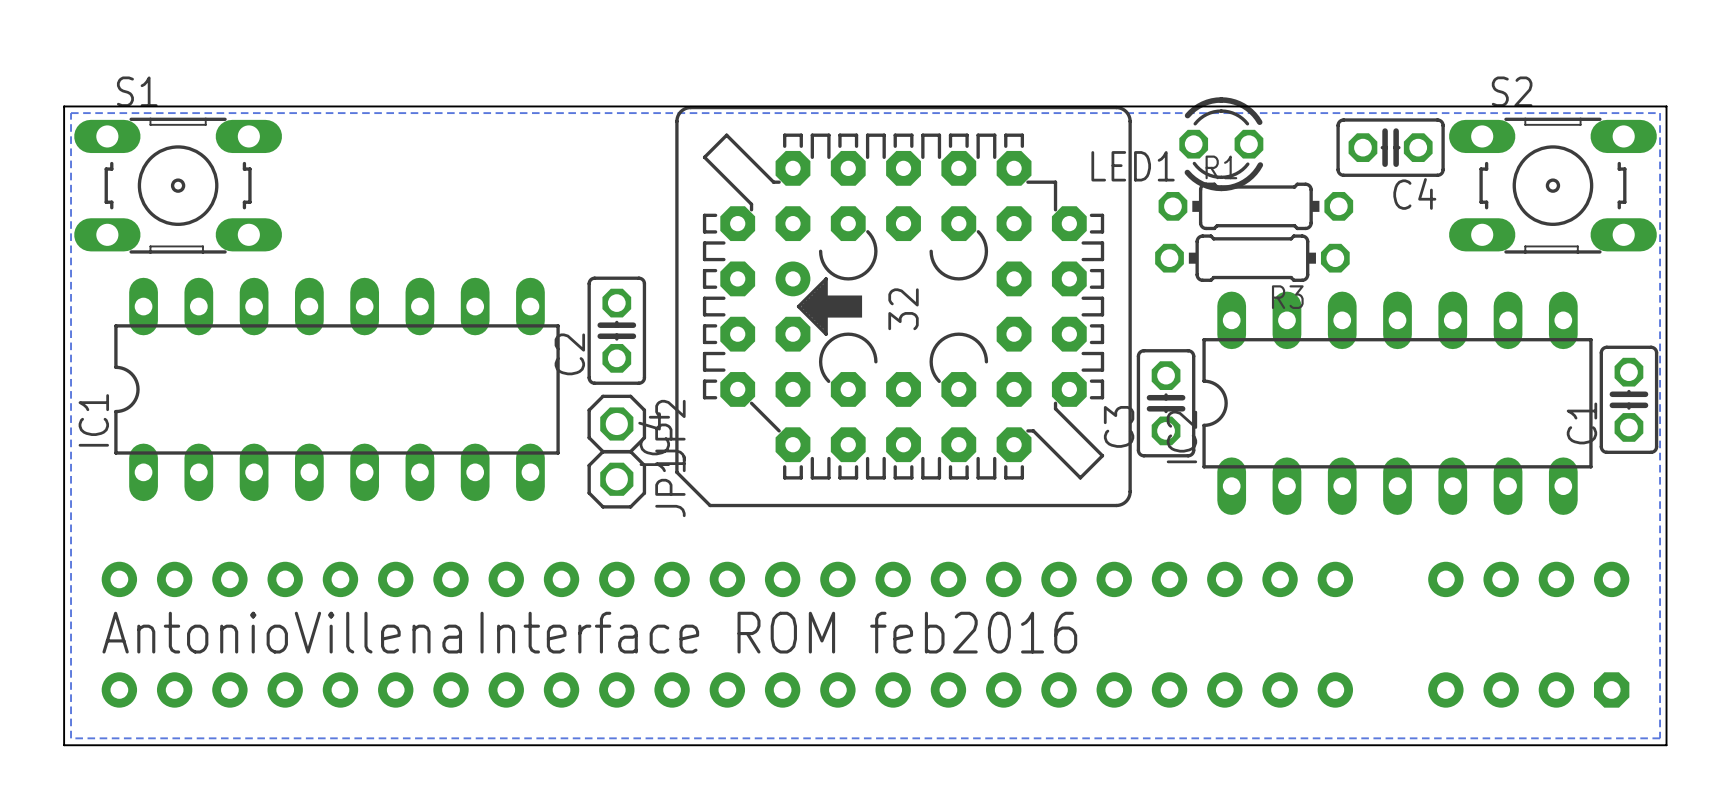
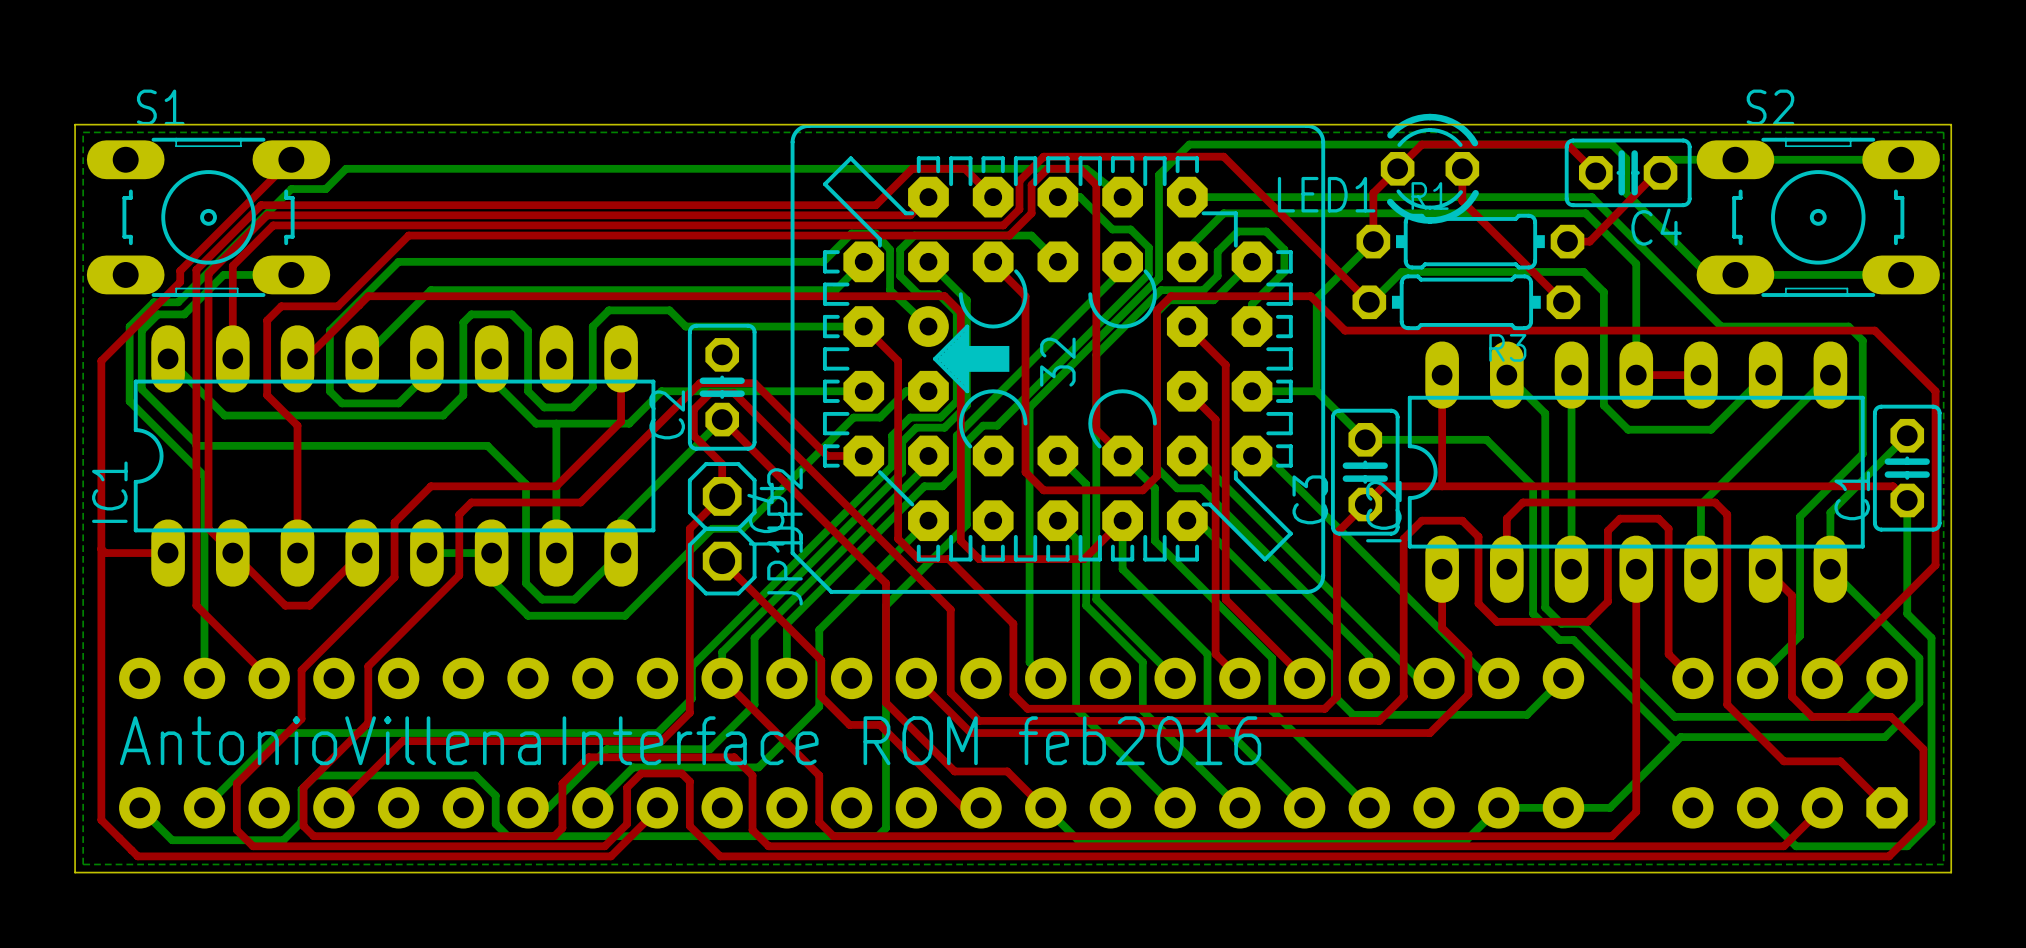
top track: none -> (291, 159) (180, 270) (180, 282) (101, 360) (101, 819) (137, 856) (610, 856) (657, 807)
bottom track: none -> (1901, 159) (1669, 159) (1658, 170)
top track: none -> (1462, 168) (1462, 201) (1563, 302)
top track: none -> (1593, 170) (1567, 144) (1421, 144) (1373, 193) (1373, 241)
top track: none -> (1658, 170) (1589, 241) (1567, 241)
top track: none -> (928, 197) (910, 215) (267, 215) (208, 273) (208, 528) (285, 605) (309, 605) (362, 553)
top track: none -> (993, 197) (964, 168) (912, 168) (875, 205) (261, 205) (196, 269) (196, 605) (269, 678)
bottom track: none -> (1057, 197) (1080, 197) (1112, 229) (1130, 229) (1148, 247) (1148, 273) (997, 425) (983, 425) (966, 441) (966, 524) (885, 605) (885, 828) (877, 836) (507, 836) (495, 824) (495, 795) (475, 775) (315, 775) (301, 789) (301, 822) (283, 840) (172, 840) (139, 807)
bottom track: none -> (1122, 197) (1086, 168) (346, 168) (325, 189) (291, 189) (178, 302) (153, 302) (129, 326) (129, 401) (204, 476) (204, 678)
bottom track: none -> (1187, 197) (1591, 197) (1721, 326) (1848, 326) (1862, 340) (1862, 453) (1800, 516) (1800, 635) (1757, 678)
bottom track: none -> (1373, 241) (1316, 298) (1316, 391)
bottom track: none -> (863, 261) (835, 290) (430, 290) (362, 358)
bottom track: none -> (928, 261) (966, 300) (966, 405) (944, 427) (916, 427) (902, 441) (902, 472) (722, 652) (722, 678)
top track: none -> (993, 261) (1025, 296) (1025, 472) (1043, 490) (1142, 490) (1156, 476) (1156, 310) (1171, 296) (1310, 296) (1345, 330) (1874, 330) (1935, 391) (1935, 565) (1822, 678)
bottom track: none -> (1057, 261) (1031, 235) (914, 235) (900, 249) (900, 276) (918, 294) (938, 294) (956, 312) (956, 401) (940, 417) (910, 417) (892, 435) (892, 466) (691, 666) (691, 698) (657, 733) (279, 733) (204, 807)
bottom track: none -> (1122, 261) (1122, 269) (956, 435) (956, 472) (942, 486) (924, 486) (786, 623) (786, 678)
bottom track: none -> (1187, 261) (1187, 249) (1223, 213) (1585, 213) (1636, 263) (1636, 375)
bottom track: none -> (1252, 261) (1213, 300) (1169, 300) (1156, 312) (1156, 468) (1177, 488) (1201, 488) (1369, 656) (1369, 678)
bottom track: none -> (291, 274) (223, 274) (184, 314) (157, 314) (141, 330) (141, 389) (196, 445) (487, 445) (526, 484) (526, 583) (542, 599) (574, 599) (621, 553) (621, 520) (722, 419)
bottom track: none -> (1901, 274) (1709, 276) (1626, 193) (1626, 158) (1611, 144) (1189, 144) (1159, 174) (1159, 278) (1029, 407) (1029, 662) (1045, 678)
bottom track: none -> (1369, 302) (1401, 271) (1583, 271) (1603, 292) (1603, 405) (1628, 429) (1711, 429) (1765, 375)
top track: none -> (1369, 302) (1223, 156) (1043, 156) (1019, 180) (1019, 209) (1003, 225) (273, 225) (232, 265) (232, 358)
bottom track: none -> (863, 326) (685, 326) (669, 310) (608, 310) (592, 326) (592, 387) (572, 407) (544, 407) (528, 391) (528, 330) (511, 314) (471, 314) (463, 322) (463, 395) (443, 415) (224, 415) (168, 358)
top track: none -> (863, 326) (898, 360) (898, 538) (918, 559) (948, 559) (1013, 623) (1013, 694) (1027, 708) (1324, 708) (1336, 696) (1336, 532) (1383, 486) (1893, 486) (1907, 500)
bottom track: none -> (928, 326) (890, 290) (890, 249) (875, 233) (851, 233) (823, 261) (398, 261) (329, 330) (329, 391) (342, 403) (398, 403) (426, 375) (426, 358)
top track: none -> (1187, 326) (1225, 364) (1225, 599) (1304, 678)
bottom track: none -> (1252, 326) (1252, 304) (1284, 271) (1284, 249) (1266, 231) (1237, 231) (1217, 251) (1217, 276) (1203, 290) (1161, 290) (1096, 354) (1096, 599) (1175, 678)
top track: none -> (297, 358) (305, 358) (368, 296) (944, 296) (960, 312) (960, 540) (979, 559) (1084, 559) (1122, 520)
bottom track: none -> (491, 358) (491, 379) (536, 423) (629, 423) (661, 391) (863, 391)
top track: none -> (621, 358) (621, 421) (556, 486) (430, 486) (394, 522) (394, 577) (301, 670) (301, 718) (236, 783) (236, 830) (253, 846) (604, 846) (627, 824) (627, 787) (641, 773) (681, 773) (689, 781) (689, 826) (720, 856) (1889, 856) (1923, 822) (1923, 749) (1891, 716) (1812, 716) (1791, 696) (1791, 595) (1765, 569)
top track: none -> (1442, 375) (1442, 486)
bottom track: none -> (1506, 375) (1545, 413) (1545, 607) (1561, 623) (1581, 623) (1674, 716) (1848, 716) (1887, 678)
bottom track: none -> (1571, 375) (1571, 569)
top track: none -> (1636, 375) (1700, 375)
bottom track: none -> (1830, 375) (1700, 504) (1700, 569)
bottom track: none -> (928, 391) (906, 391) (879, 417) (853, 417) (742, 528) (712, 528) (625, 615) (528, 615) (491, 579) (491, 553) (426, 553)
top track: none -> (1187, 391) (1215, 419) (1215, 654) (1239, 678)
bottom track: none -> (1252, 391) (1316, 391)
bottom track: none -> (1316, 391) (1365, 439) (1486, 439) (1533, 486) (1533, 613) (1559, 640) (1573, 640) (1675, 742)
top track: none -> (722, 419) (885, 583) (885, 702) (954, 771) (1007, 771) (1045, 807)
bottom track: none -> (556, 423) (556, 553)
bottom track: none -> (1907, 435) (1830, 512) (1830, 569) (1919, 658) (1919, 702) (1885, 737) (1680, 737) (1609, 807) (1498, 807) (1466, 840) (1078, 840) (1045, 807)
top track: none -> (863, 455) (827, 455) (754, 383) (699, 383) (580, 502) (471, 502) (459, 514) (459, 575) (368, 666) (368, 722) (303, 787) (303, 826) (313, 836) (554, 836) (562, 828) (562, 783) (588, 757) (734, 757) (752, 775) (752, 830) (768, 846) (1783, 846) (1822, 807)
bottom track: none -> (928, 455) (928, 464) (754, 637) (754, 704) (710, 749) (606, 749) (548, 807) (528, 807)
bottom track: none -> (1057, 455) (1086, 484) (1086, 605) (1142, 662) (1142, 710) (1239, 807)
bottom track: none -> (1122, 455) (1154, 488) (1154, 540) (1272, 658) (1272, 710) (1369, 807)
top track: none -> (1122, 455) (1096, 429) (1096, 184) (1080, 168) (1047, 168) (1031, 184) (1031, 213) (1009, 235) (408, 235) (337, 306) (281, 306) (267, 320) (267, 395) (297, 425) (297, 553)
bottom track: none -> (1187, 455) (1195, 455) (1417, 678) (1434, 678)
bottom track: none -> (1252, 455) (1266, 455) (1488, 678) (1498, 678)
bottom track: none -> (1907, 500) (1907, 613) (1931, 637) (1931, 822) (1907, 846) (1796, 846) (1757, 807)
bottom track: none -> (928, 520) (819, 629) (819, 706) (758, 767) (633, 767) (592, 807)
bottom track: none -> (1057, 520) (1076, 538) (1076, 708) (1175, 807)
bottom track: none -> (1122, 520) (1122, 569) (1207, 654) (1207, 710) (1304, 807)
bottom track: none -> (1187, 520) (1197, 520) (1334, 658) (1334, 696) (1353, 714) (1527, 714) (1563, 678)
top track: none -> (101, 549) (105, 553) (168, 553)
top track: none -> (722, 561) (821, 660) (821, 696) (849, 724) (879, 724) (962, 807) (981, 807)
top track: none -> (1442, 569) (1442, 627) (1468, 654) (1468, 694) (1429, 733) (970, 733) (916, 678)
top track: none -> (1506, 569) (1506, 518) (1523, 502) (1715, 502) (1727, 514) (1727, 704) (1783, 761) (1840, 761) (1887, 807)
top track: none -> (1636, 569) (1636, 811) (1611, 836) (833, 836) (819, 822) (819, 775) (722, 678)
top track: none -> (1692, 678) (1668, 654) (1668, 528) (1658, 518) (1620, 518) (1607, 530) (1607, 601) (1587, 621) (1496, 621) (1478, 603) (1478, 536) (1462, 520) (1421, 520) (1403, 538) (1403, 696) (1379, 720) (979, 720) (950, 692) (950, 609) (734, 393) (710, 393) (693, 409) (693, 435) (722, 464) (722, 496) (689, 528) (689, 712) (661, 741) (402, 741) (333, 807)

